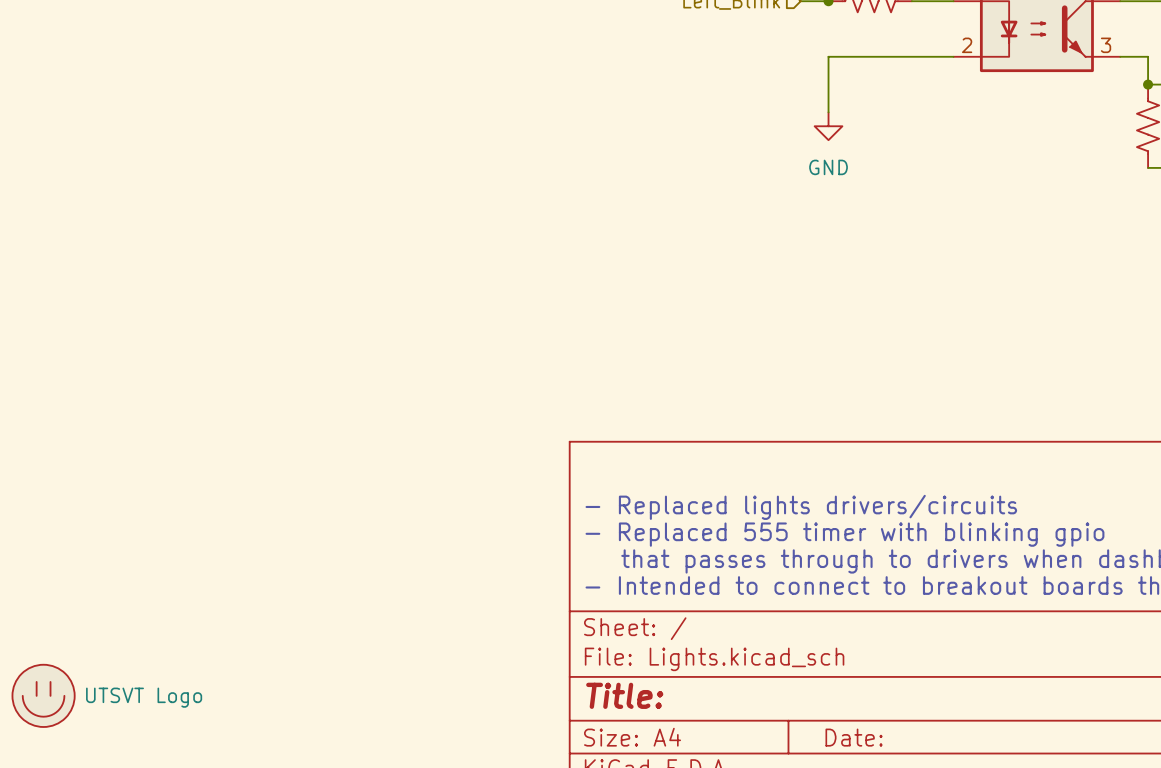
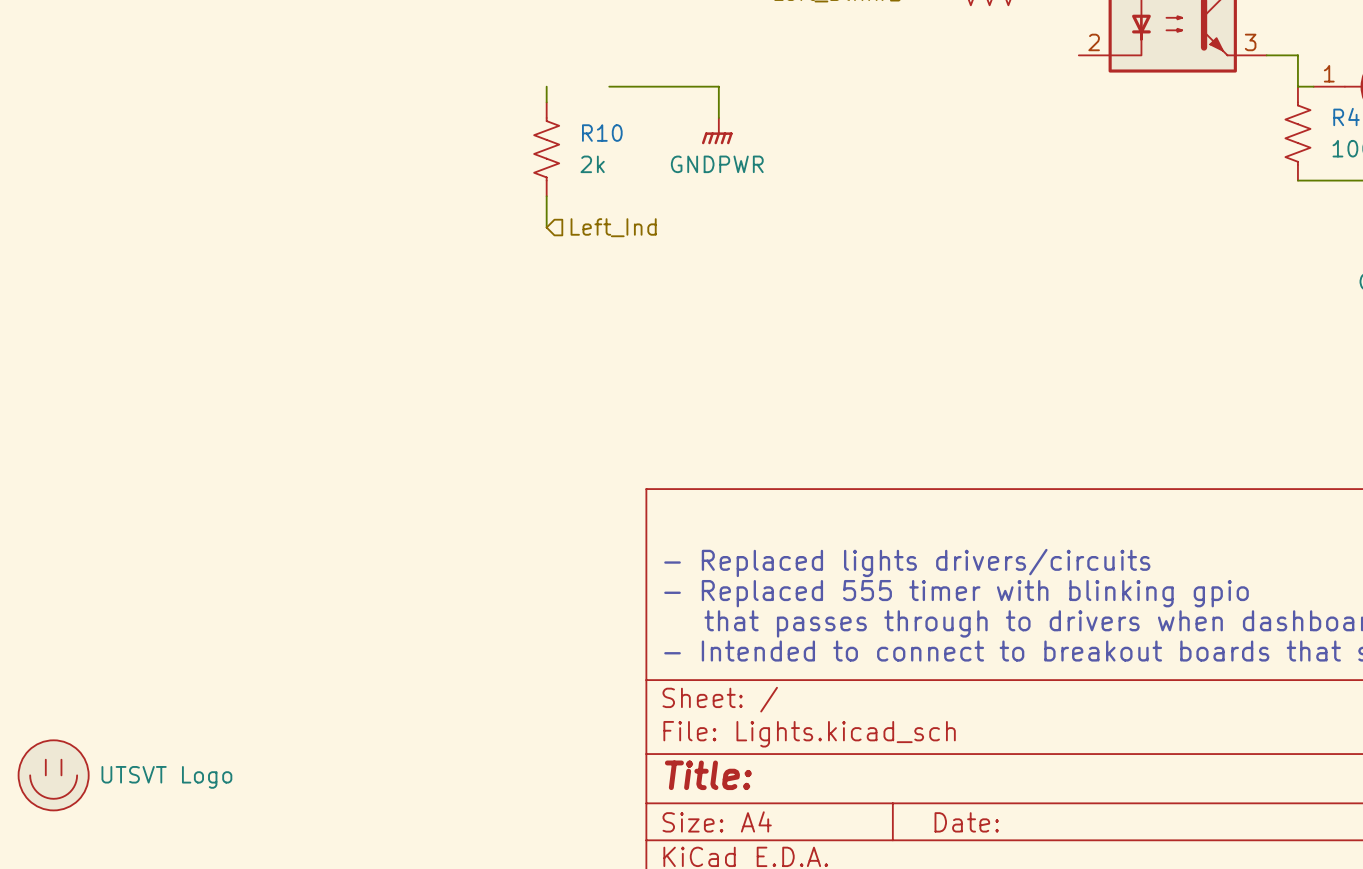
wire: (953, 56) (828, 56) (828, 112) -> none
wire: none -> (546, 86) (546, 102)
wire: none -> (609, 86) (718, 86) (718, 117)
junction: (1148, 84) -> none
power symbol: none -> GNDPWR (717, 131)
power symbol: GND (828, 126) -> none
R10: none -> 2k (546, 149)
wire: none -> (546, 196) (546, 227)
hierarchical label: none -> Left_Ind (613, 227)

